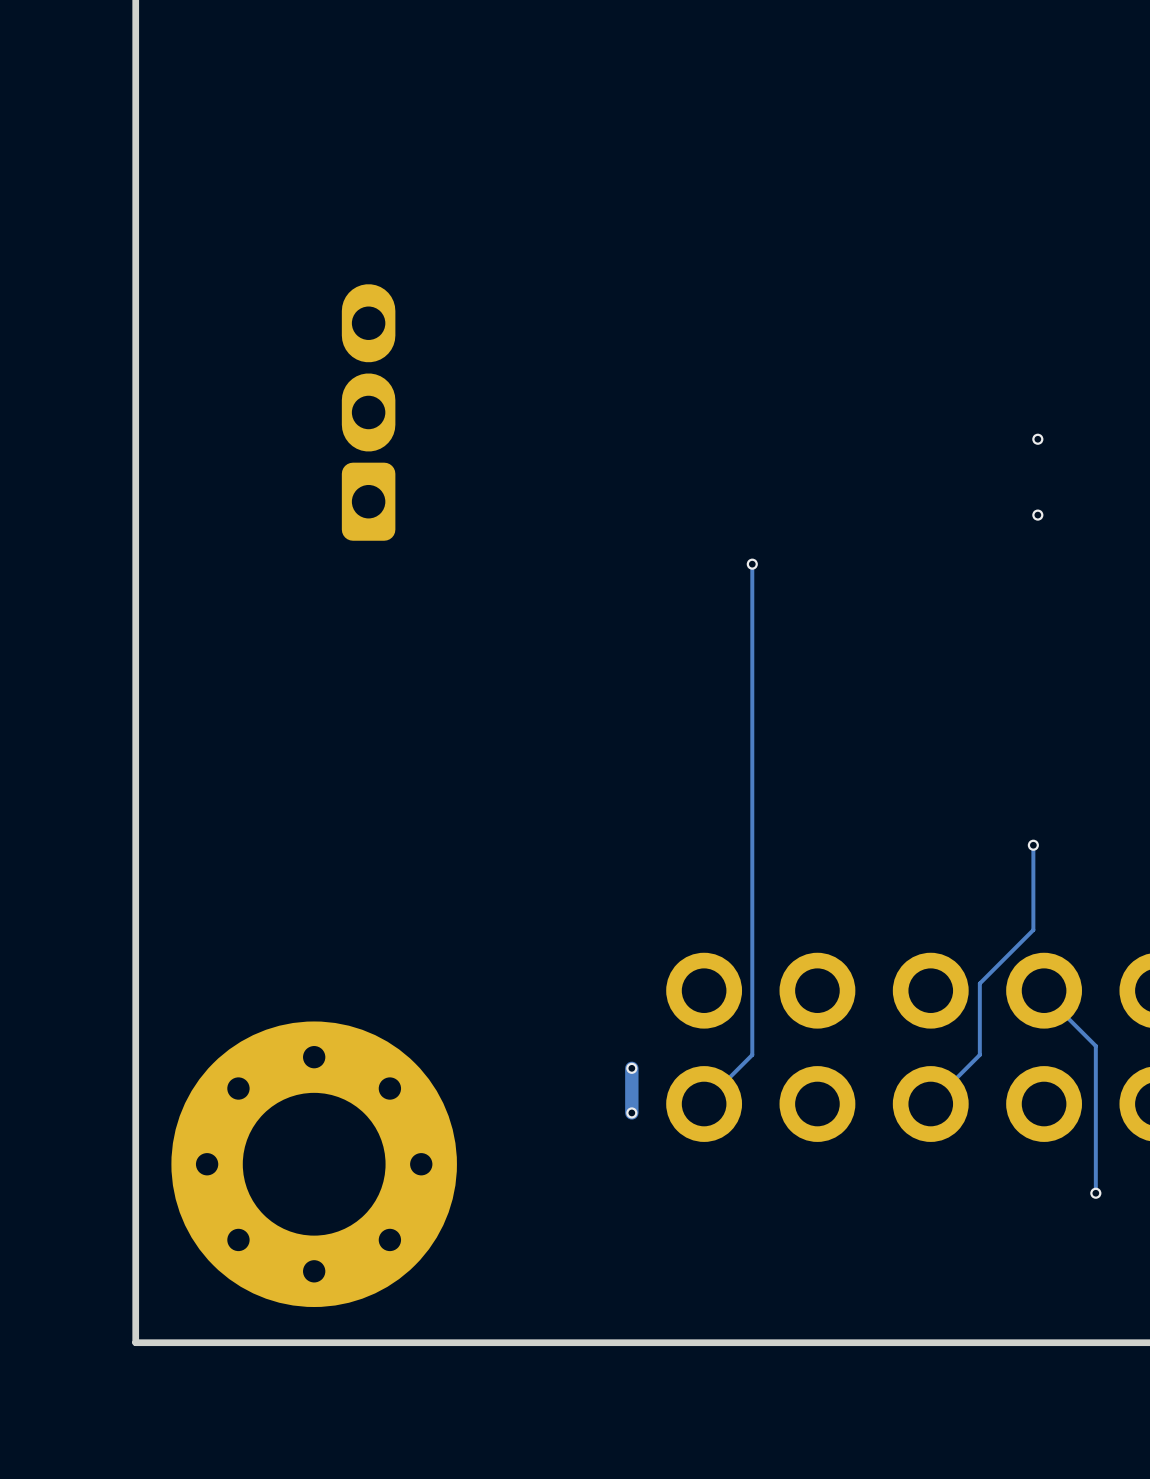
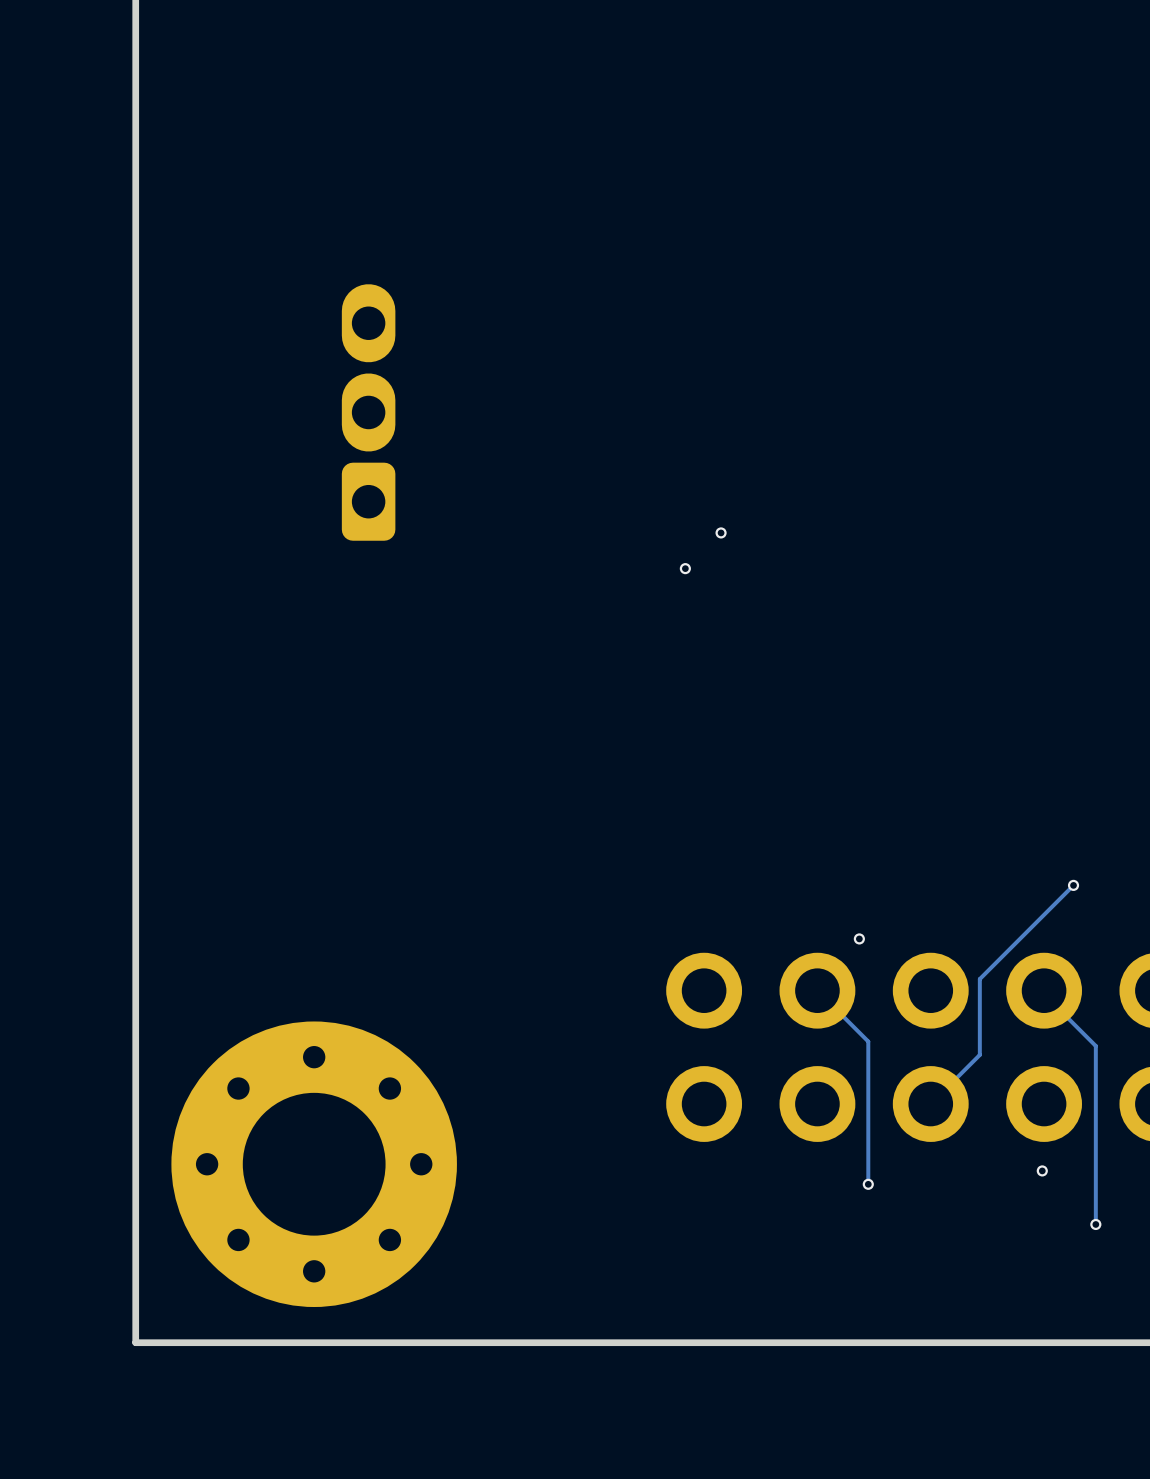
via: (1037, 439) -> none
via: (1037, 515) -> none
via: none -> (721, 532)
track: (752, 564) (752, 1054) (703, 1104) -> none
via: (752, 564) -> none
via: none -> (685, 568)
track: (1033, 845) (1033, 930) (979, 983) -> (1073, 885) (979, 979) (979, 983)
via position: (1033, 845) -> (1073, 885)
via: none -> (859, 938)
track: none -> (819, 992) (868, 1041) (868, 1184)
track: (631, 1068) (631, 1112) -> none
via: (631, 1068) -> none
via: (631, 1112) -> none
via: none -> (1042, 1170)
via: none -> (868, 1184)
track: none -> (1095, 1193) (1095, 1224)
via: (1095, 1193) -> none
via: none -> (1095, 1224)

